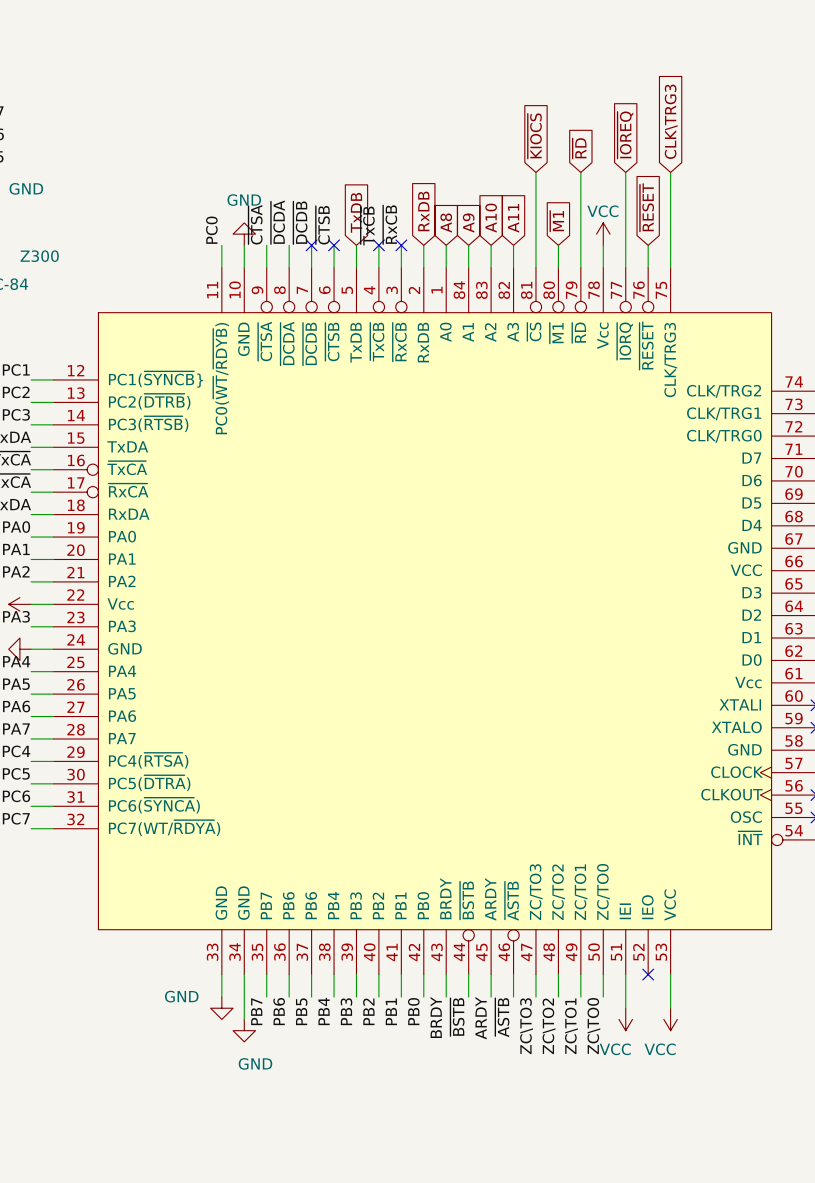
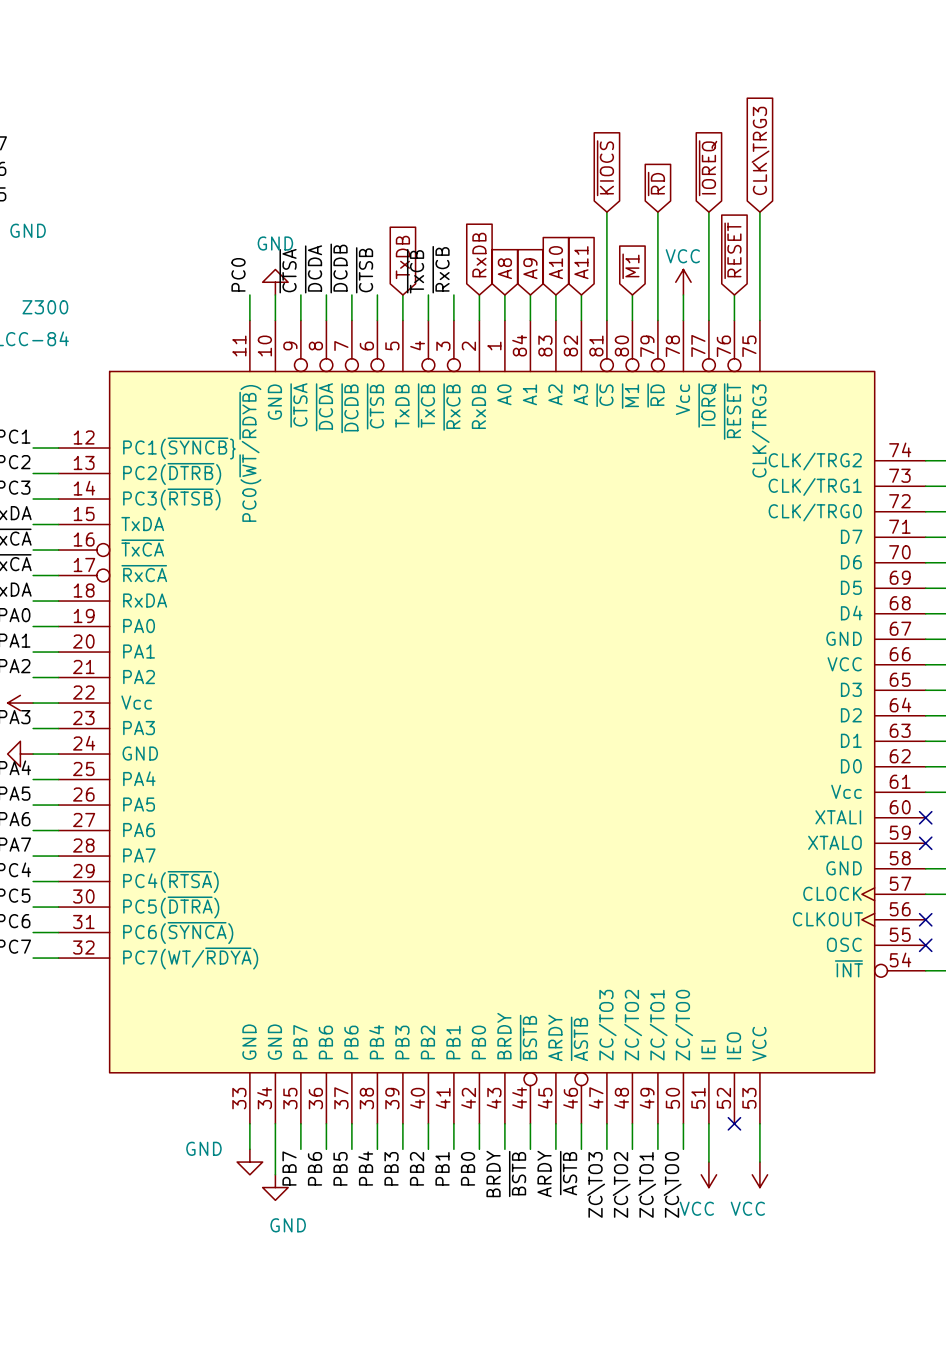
no-connect mark: (311, 245) -> none
no-connect mark: (334, 245) -> none
no-connect mark: (378, 245) -> none
no-connect mark: (401, 245) -> none

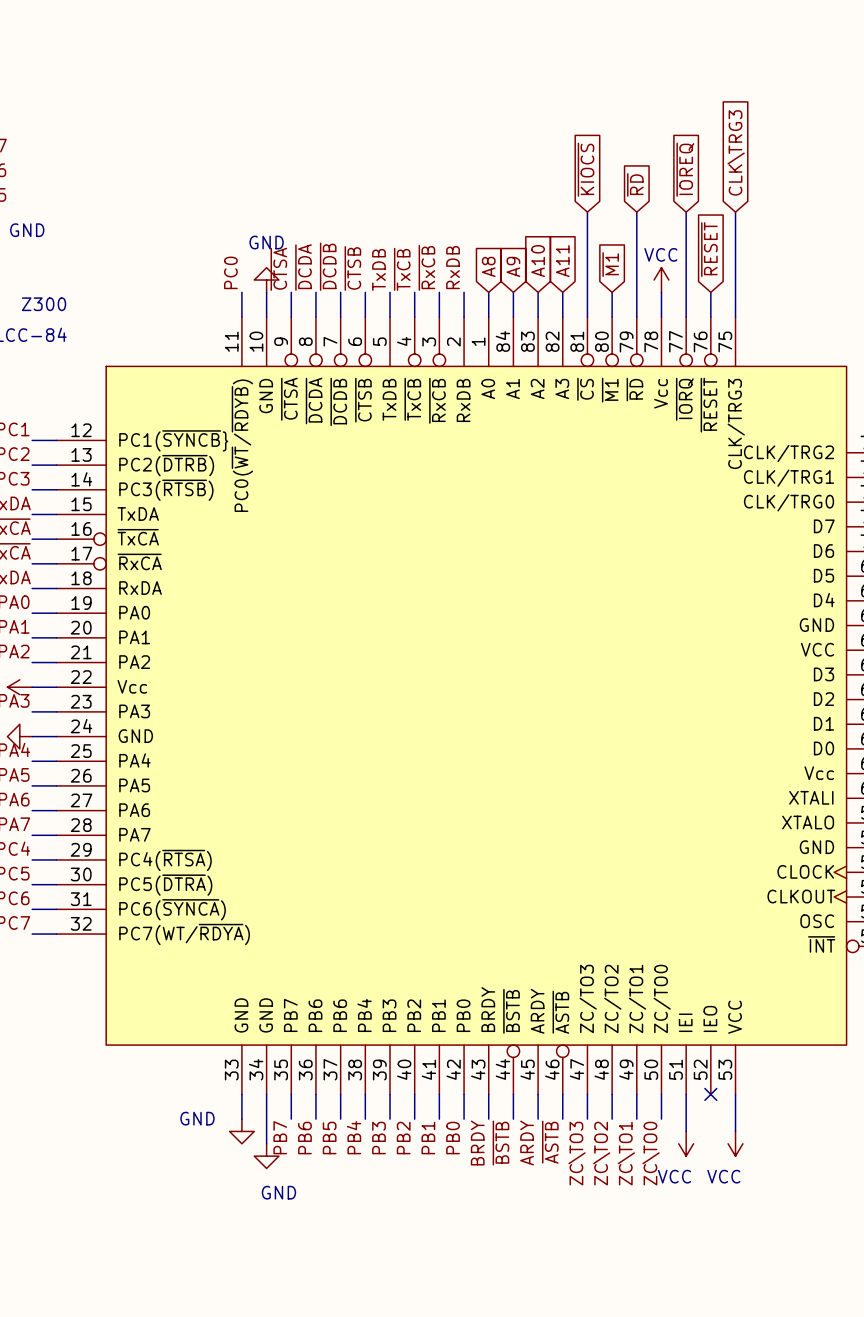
global label: RxDB (479, 255) -> none
global label: TxDB (402, 257) -> none
label: none -> RxDB (453, 267)
label: none -> TxDB (378, 269)

